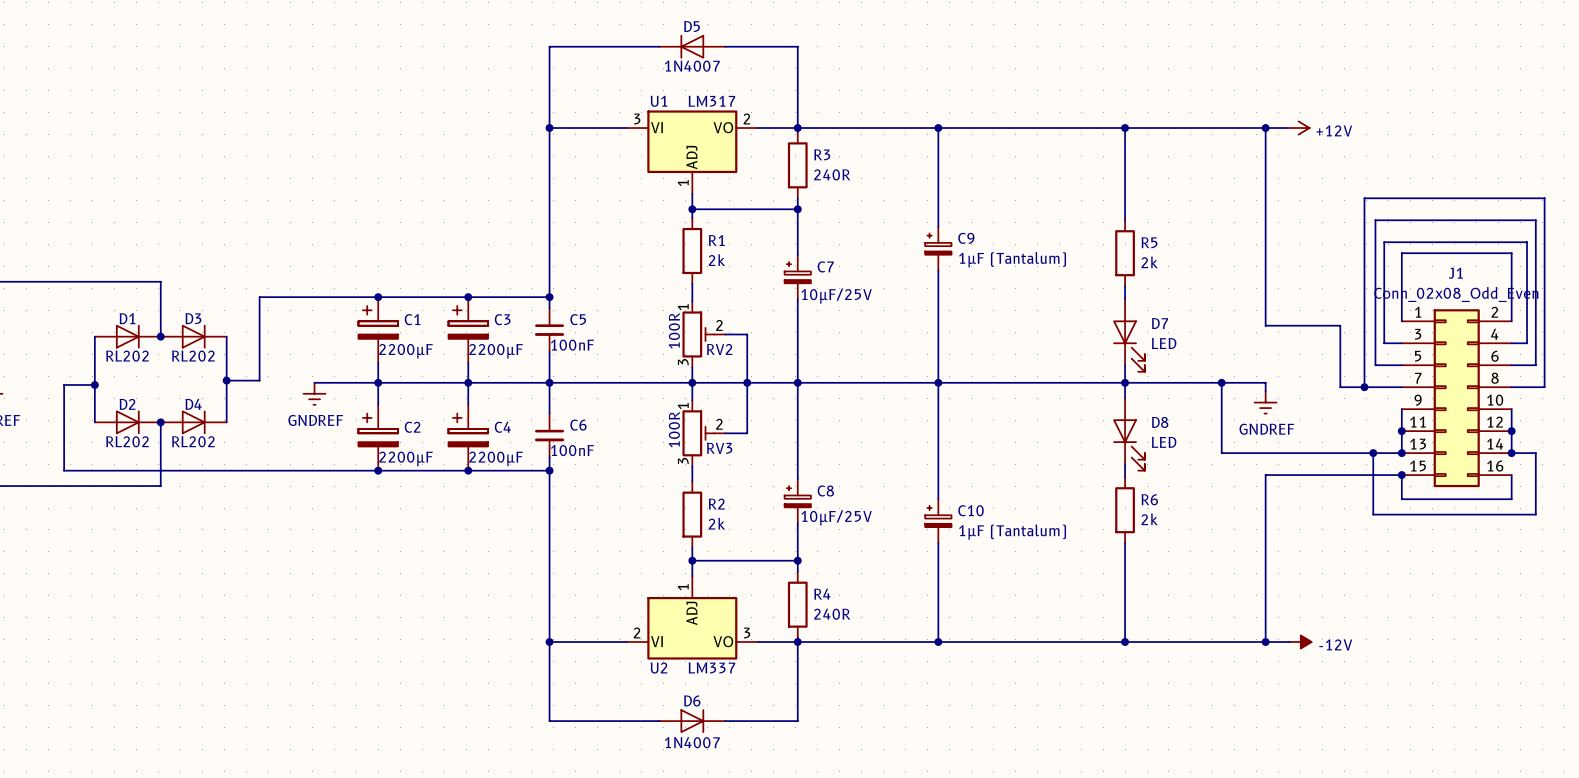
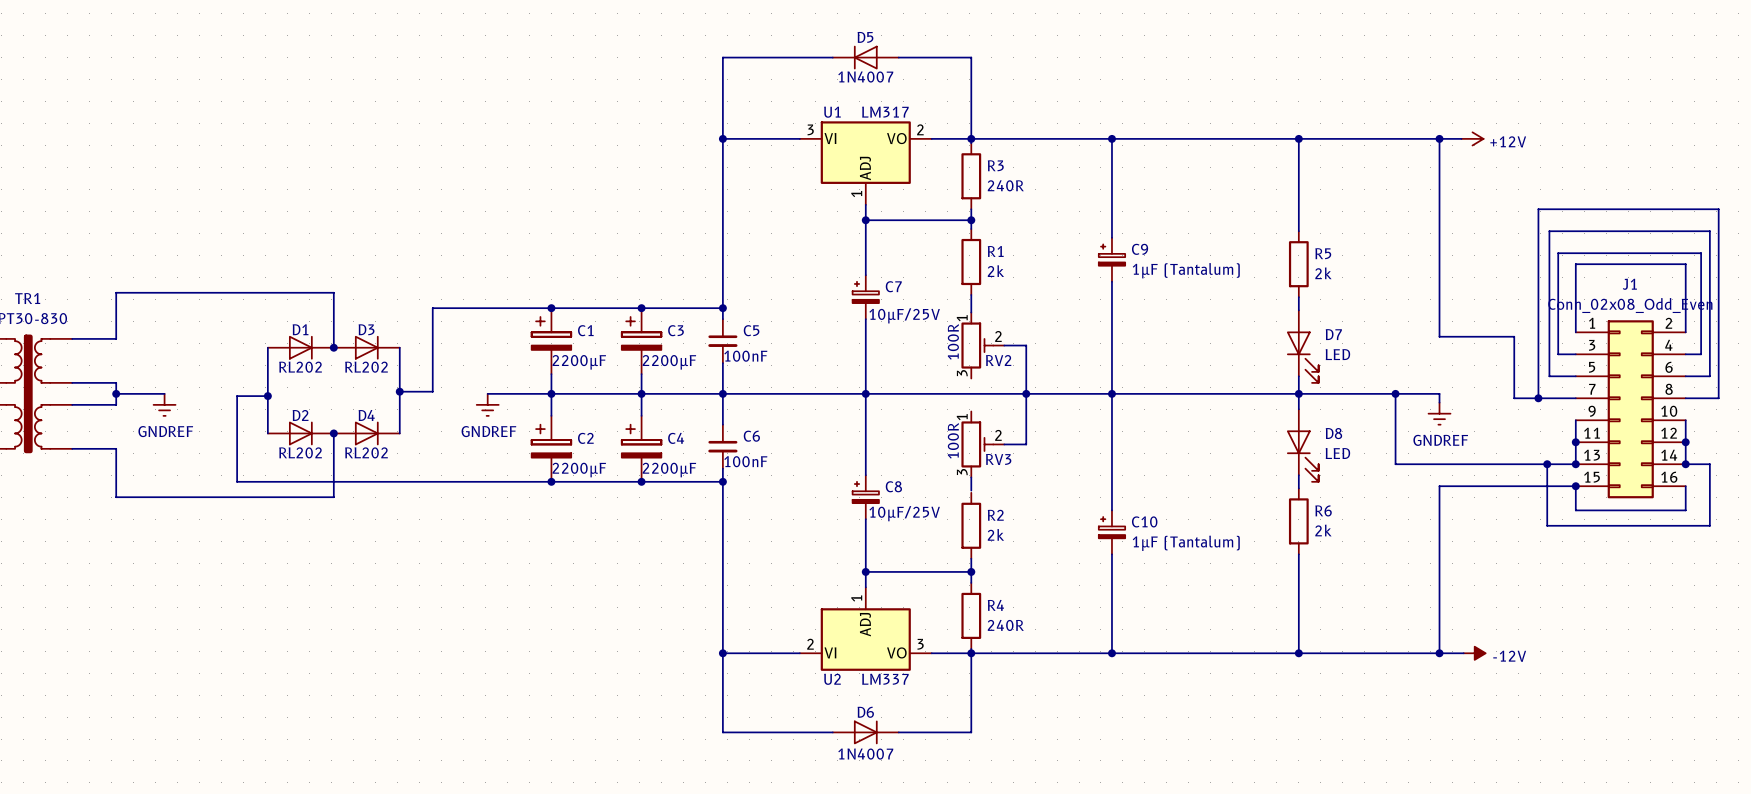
wire: none -> (865, 229) (865, 275)
wire: (797, 218) (797, 255) -> none
R1 position: (692, 251) -> (971, 262)
C7 position: (797, 277) -> (865, 297)
wire: (797, 301) (797, 466) -> none
wire: none -> (865, 319) (865, 378)
RV2 position: (703, 334) -> (982, 345)
wire: (725, 334) (747, 334) (747, 433) (725, 433) -> (1004, 345) (1026, 345) (1026, 444) (1004, 444)
junction: (747, 382) -> none
junction: (797, 382) -> none
junction: none -> (1026, 393)
wire: none -> (865, 411) (865, 475)
RV3 position: (703, 433) -> (982, 444)
C8 position: (797, 501) -> (865, 497)
wire: none -> (865, 519) (865, 558)
R2 position: (692, 514) -> (971, 525)
wire: (797, 523) (797, 547) -> none

